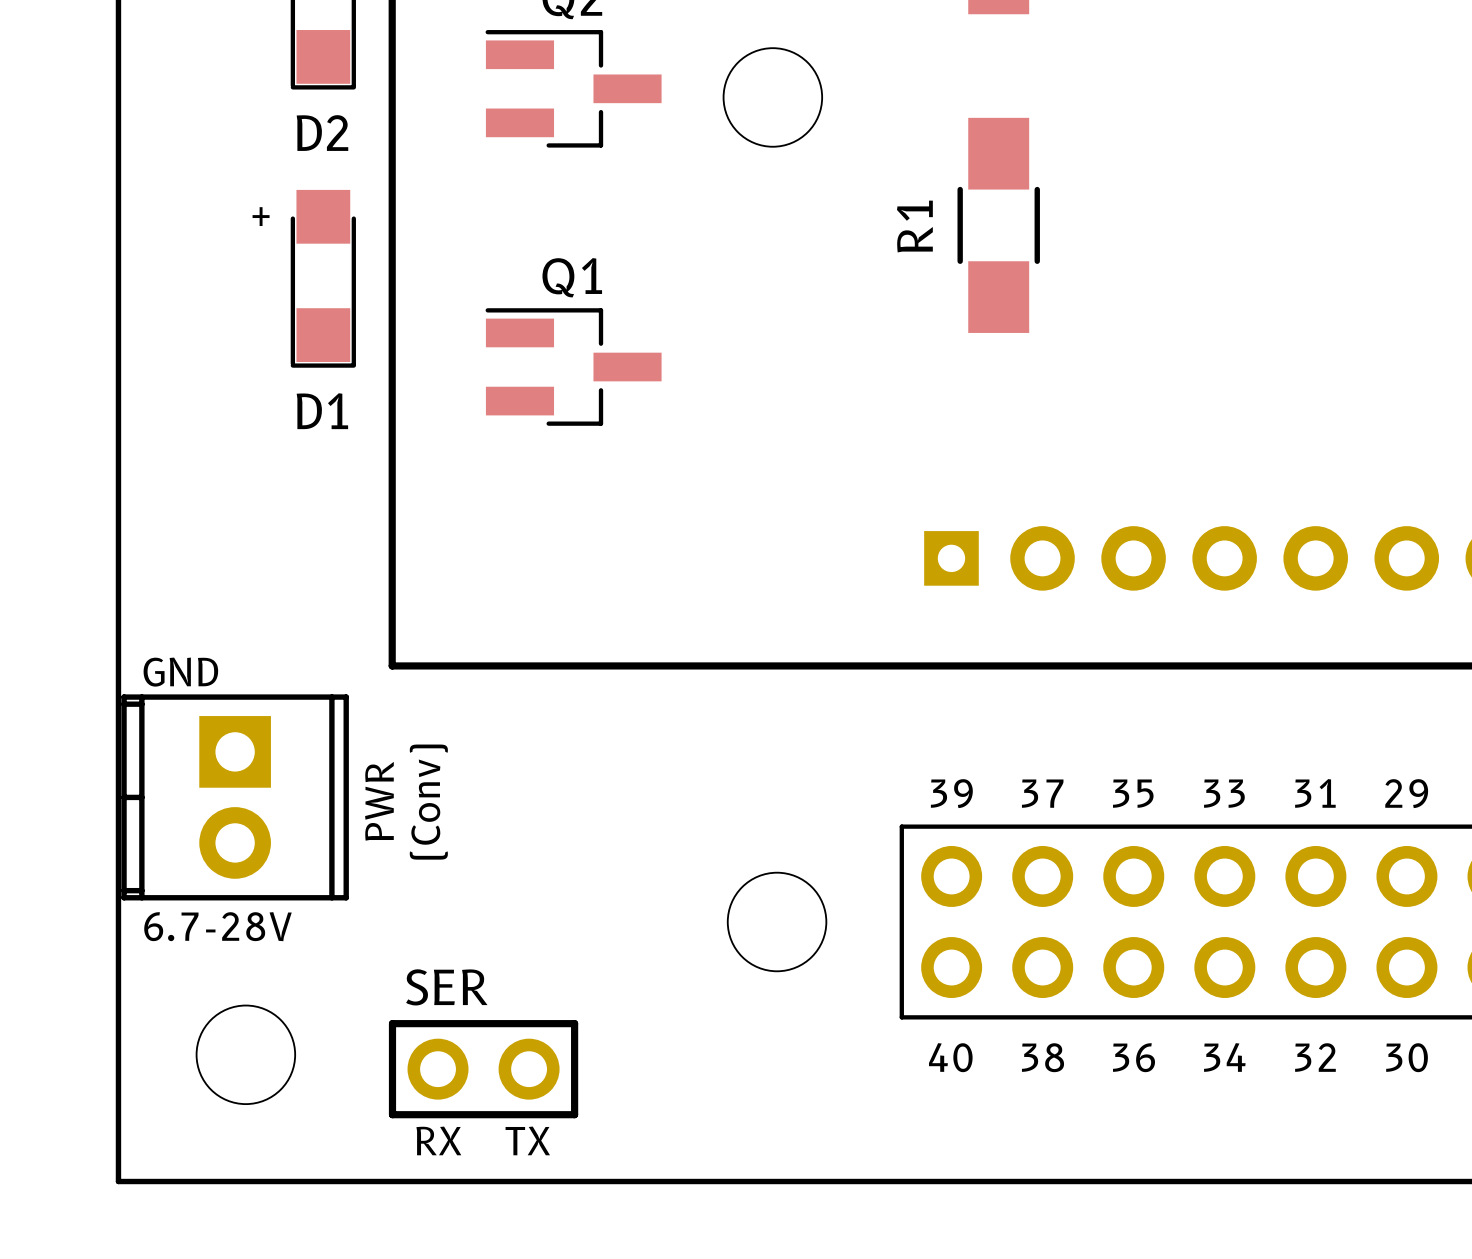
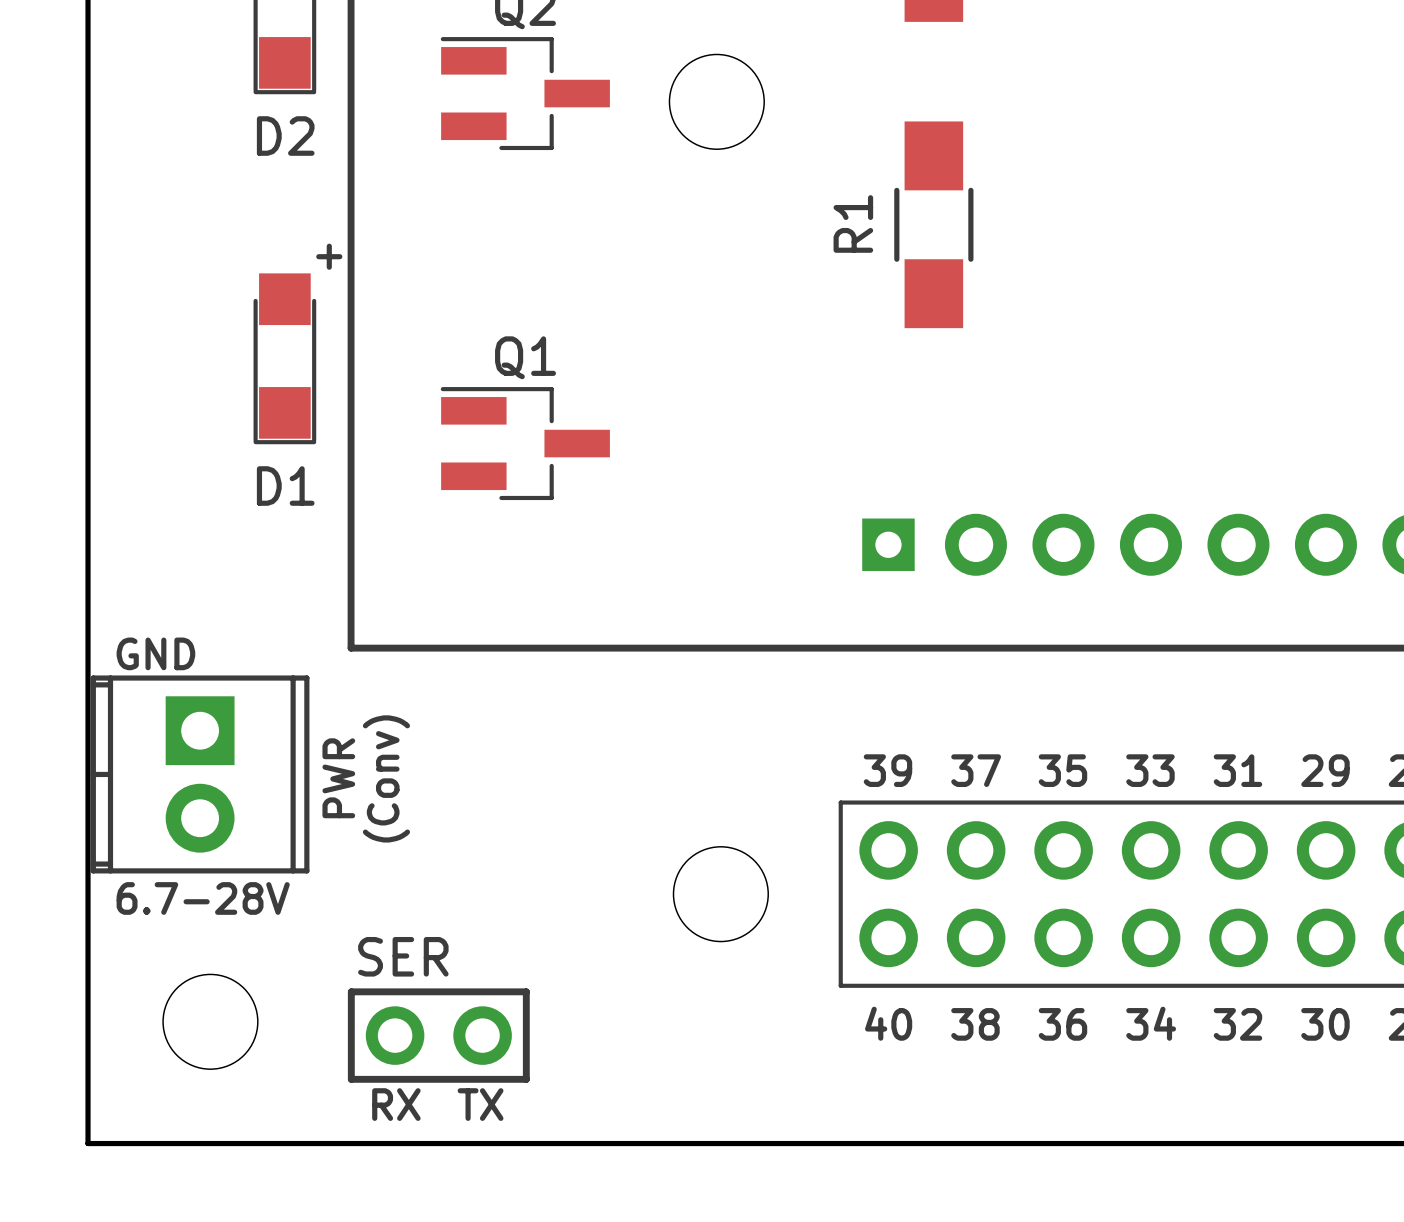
text position: + (261, 216) -> + (329, 256)
D1 position: (323, 278) -> (284, 358)
Q1 position: (573, 367) -> (525, 443)

